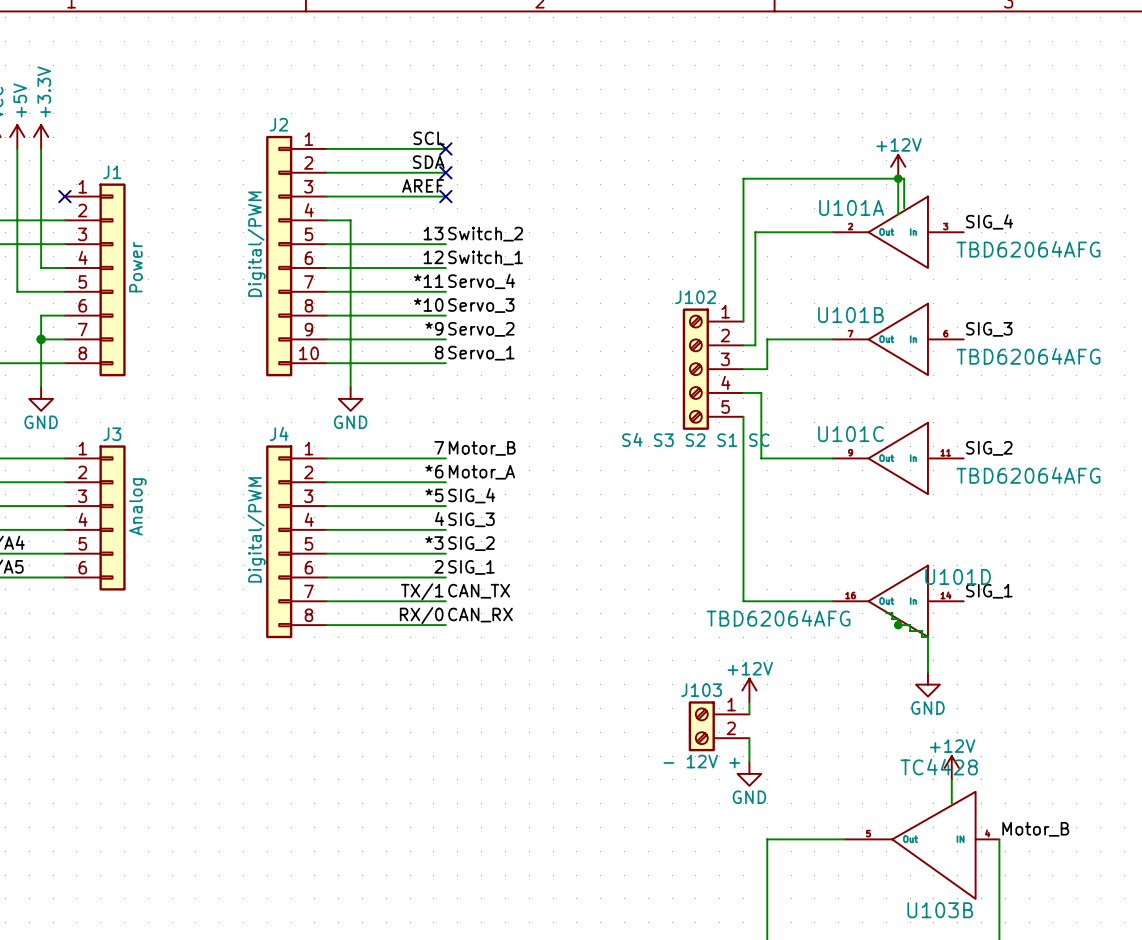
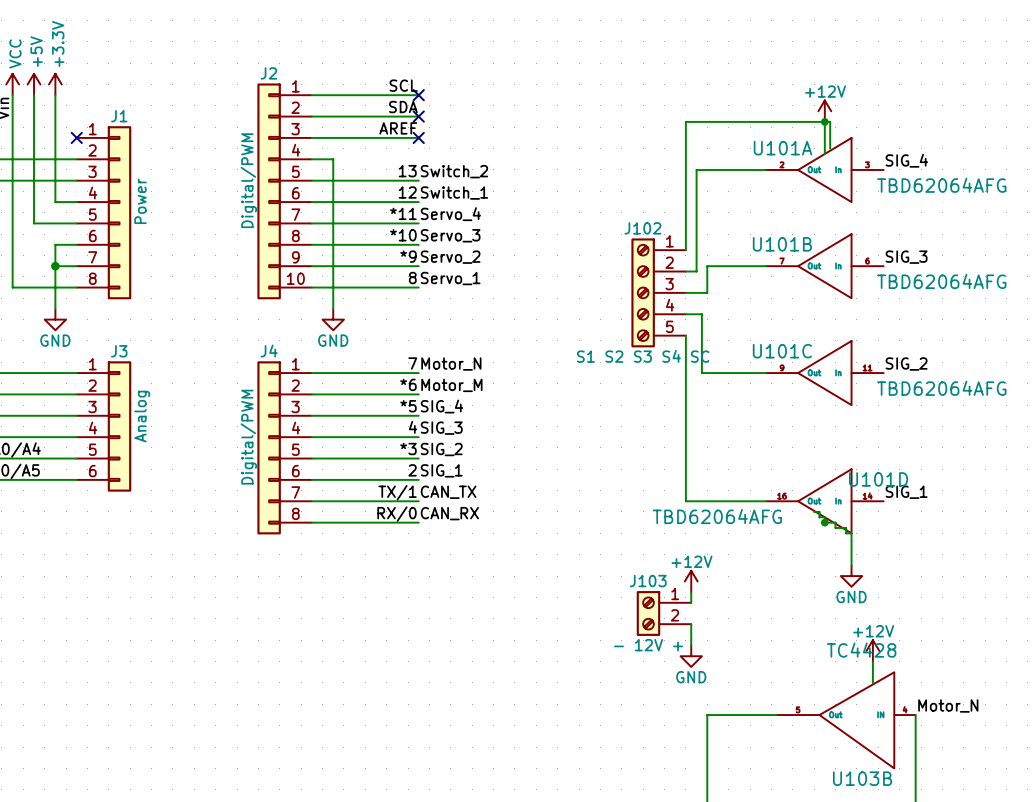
J102 value: S4 S3 S2 S1 SC (695, 439) -> S1 S2 S3 S4 SC (643, 356)
label: Motor_B (482, 448) -> Motor_N (451, 364)
label: Motor_A (481, 472) -> Motor_M (451, 385)
label: Motor_B (1035, 829) -> Motor_N (948, 705)

